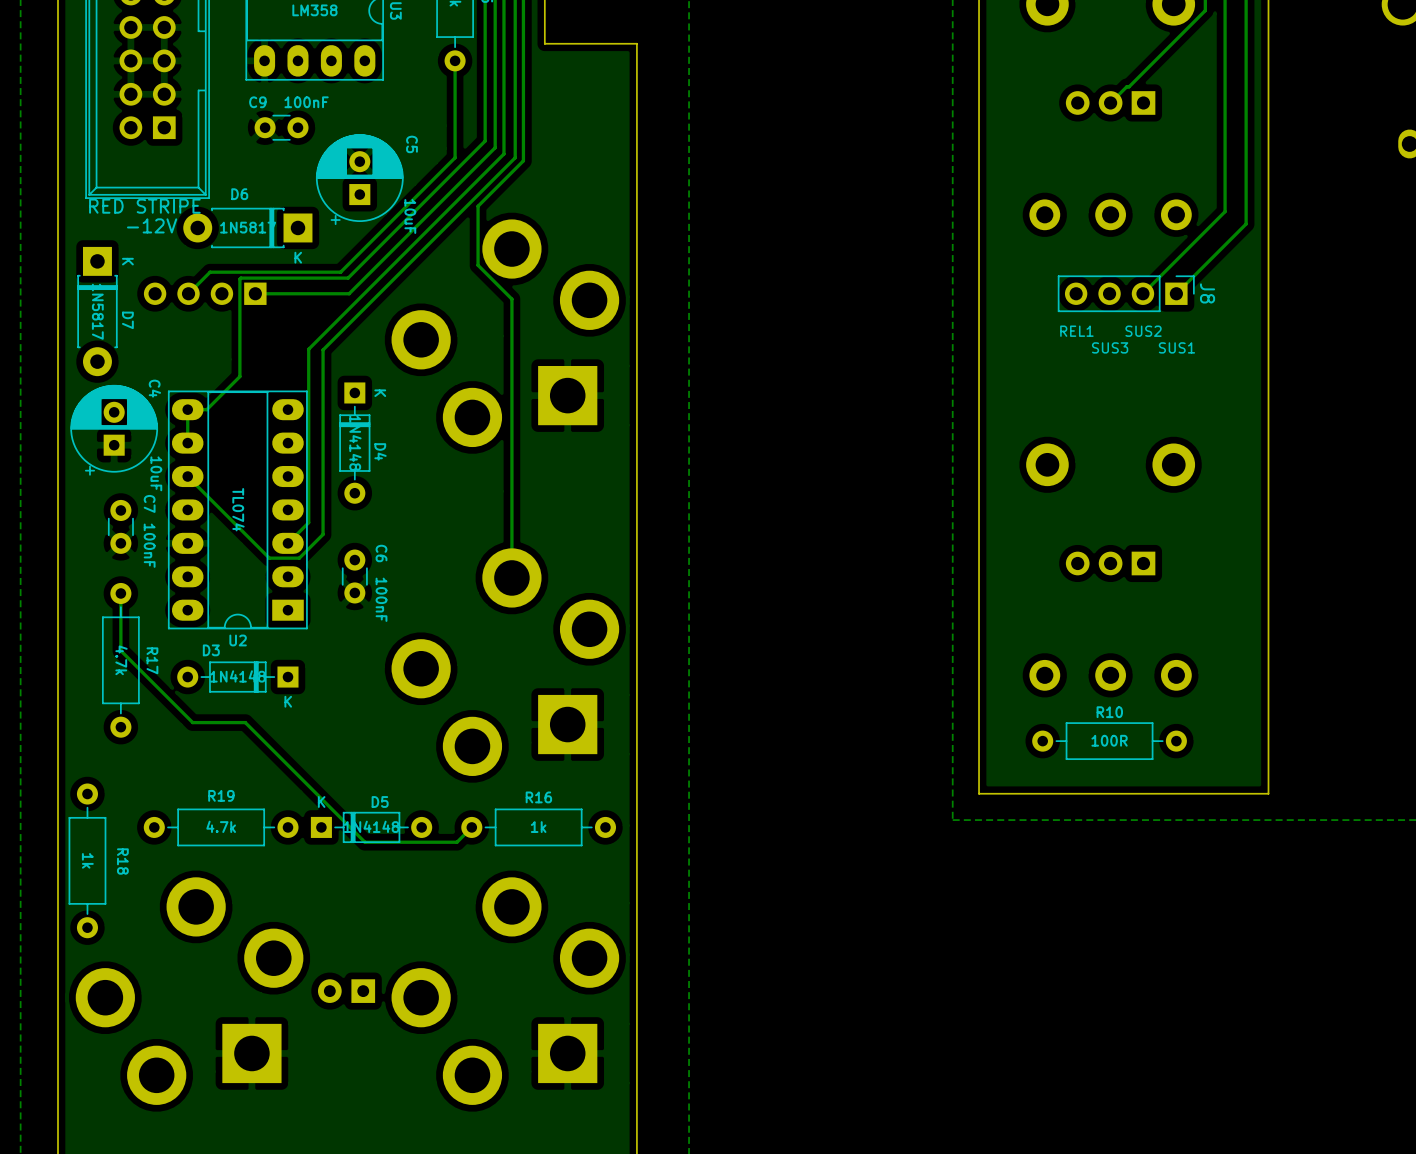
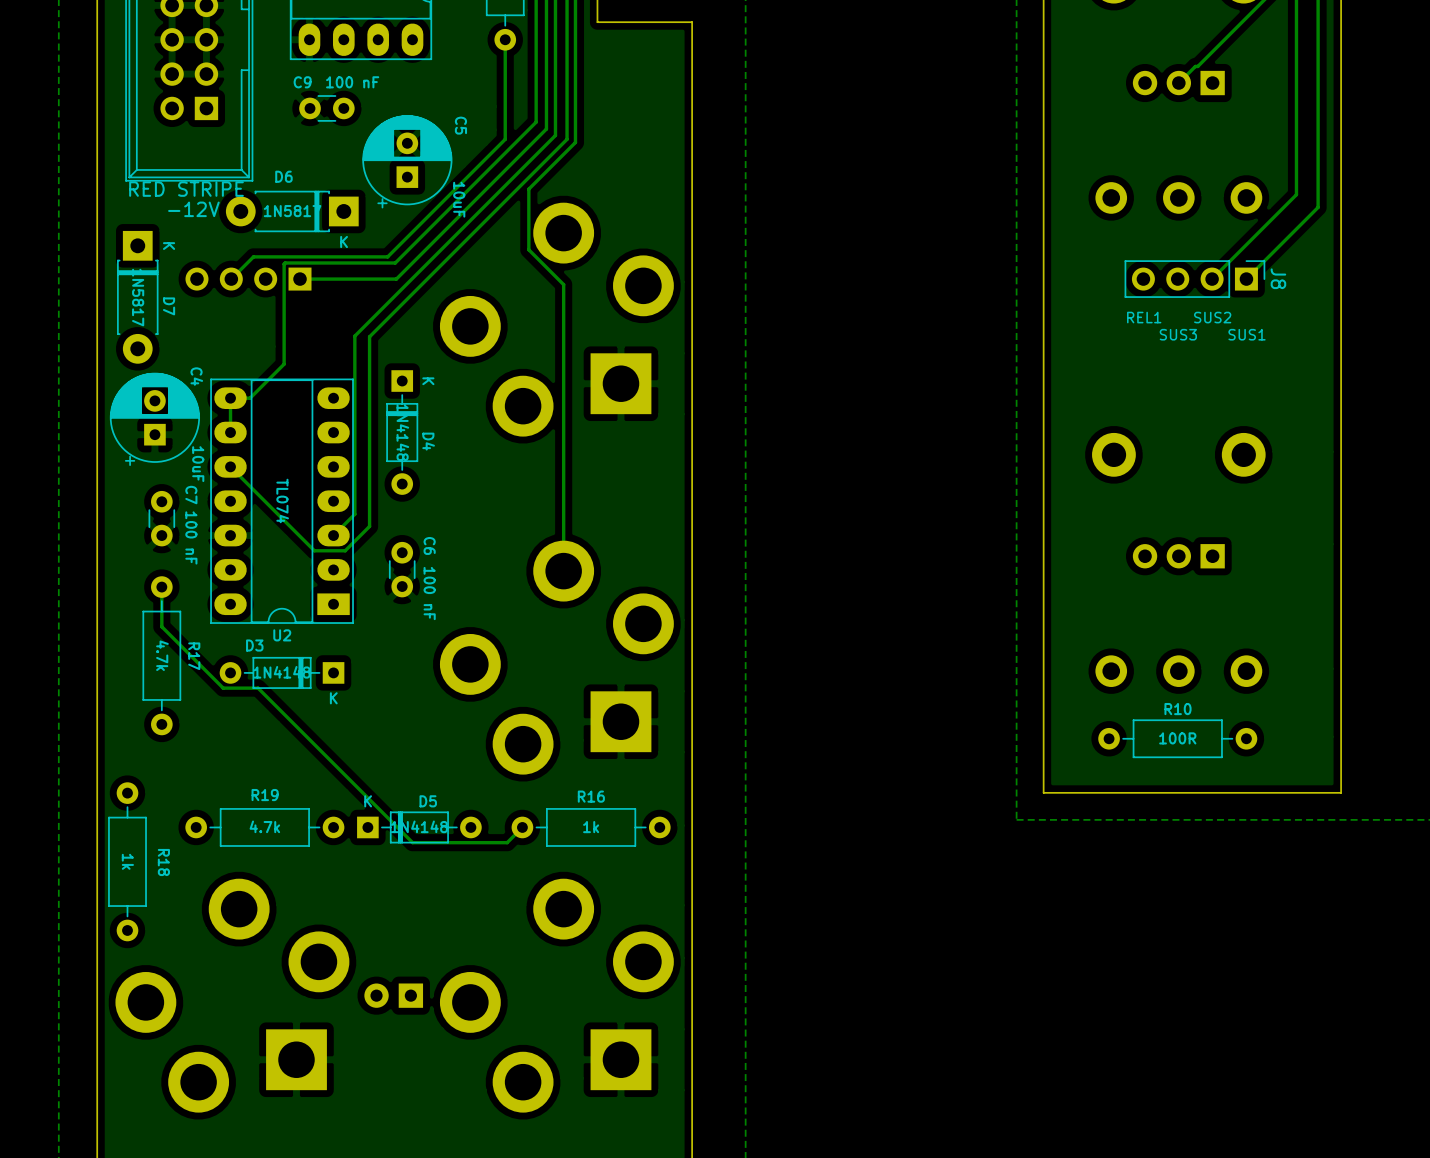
C9 value: 100nF (306, 102) -> 100 nF (352, 82)
C7 value: 100nF (149, 545) -> 100 nF (191, 537)
C6 value: 100nF (381, 599) -> 100 nF (429, 593)
track: (120, 632) (120, 650) (192, 722) (245, 722) -> (161, 626) (223, 688) (258, 688) (289, 719)

